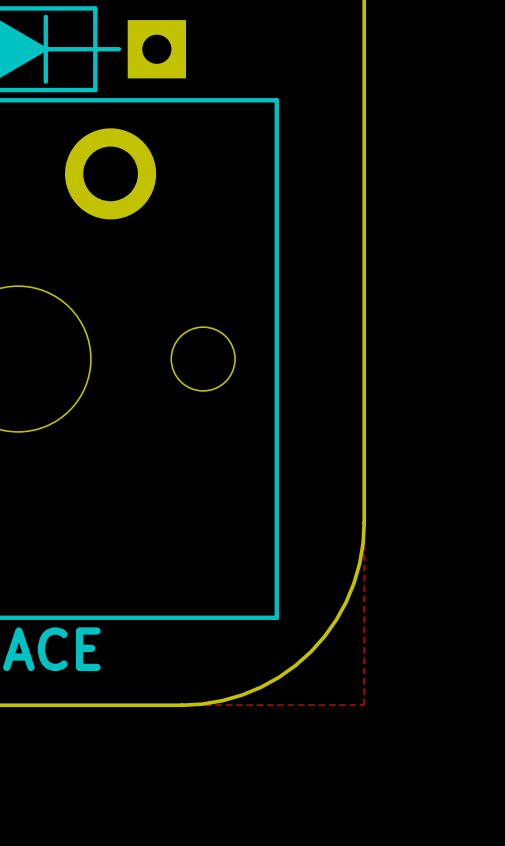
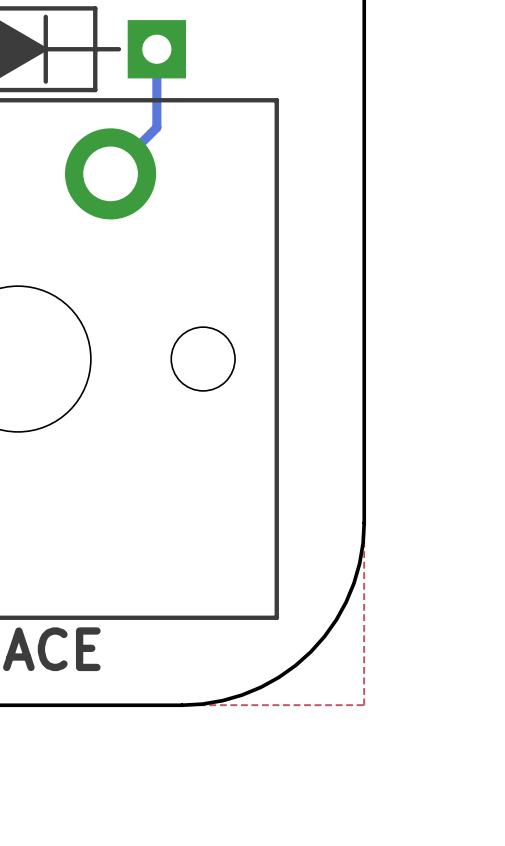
bottom track: none -> (156, 49) (156, 127) (110, 173)

